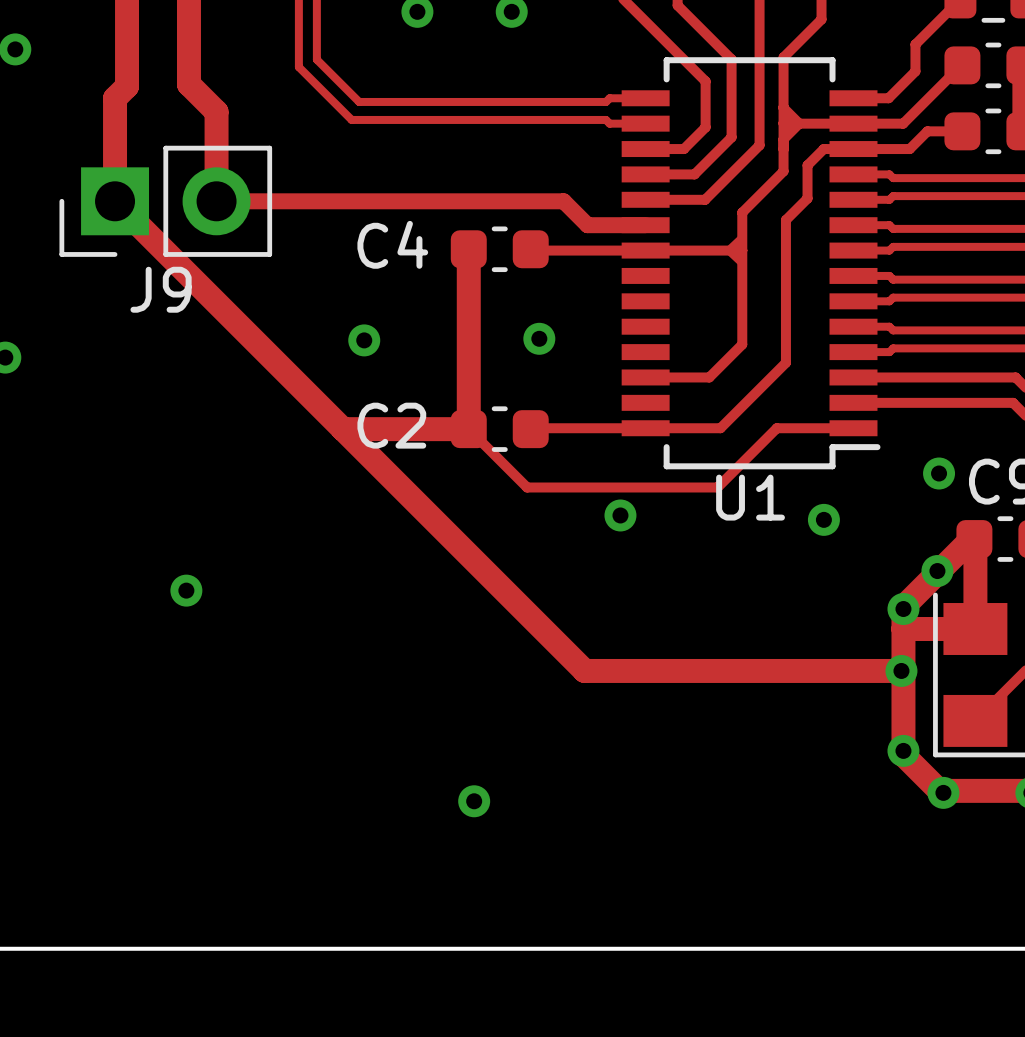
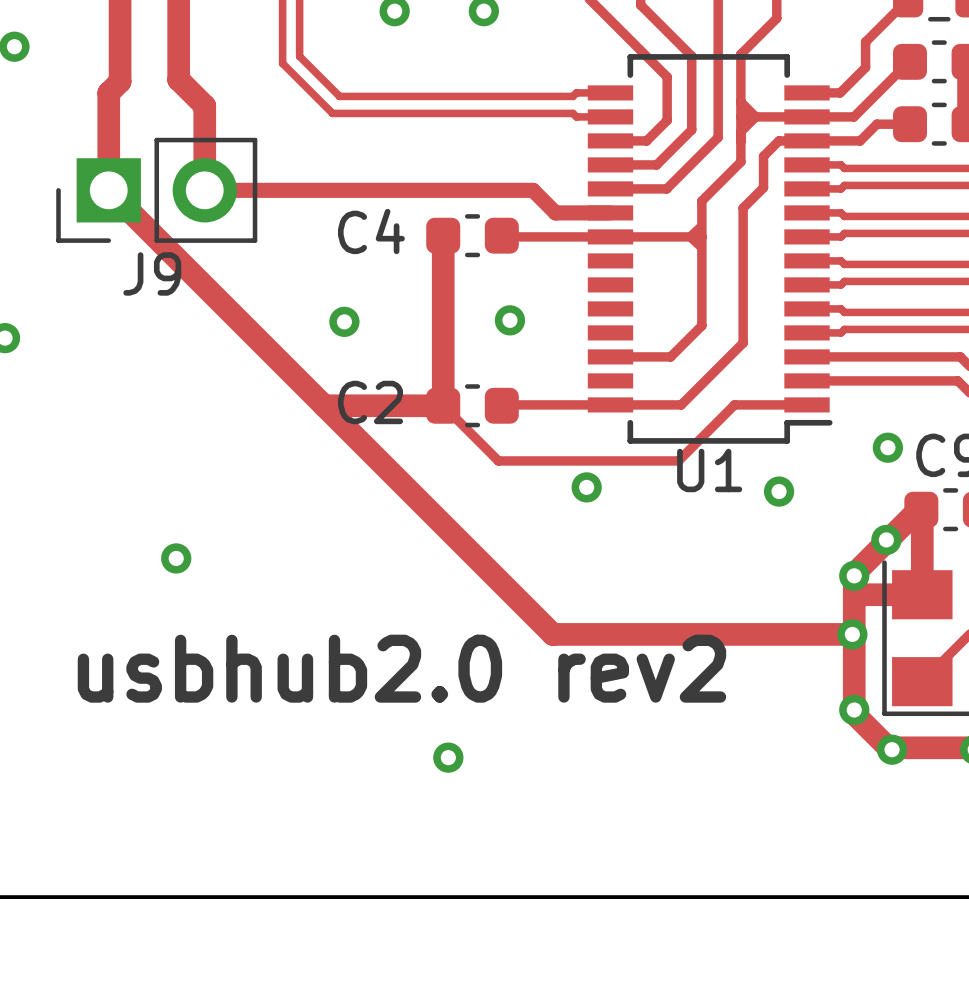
text: none -> usbhub2.0 rev2 (401, 668)

